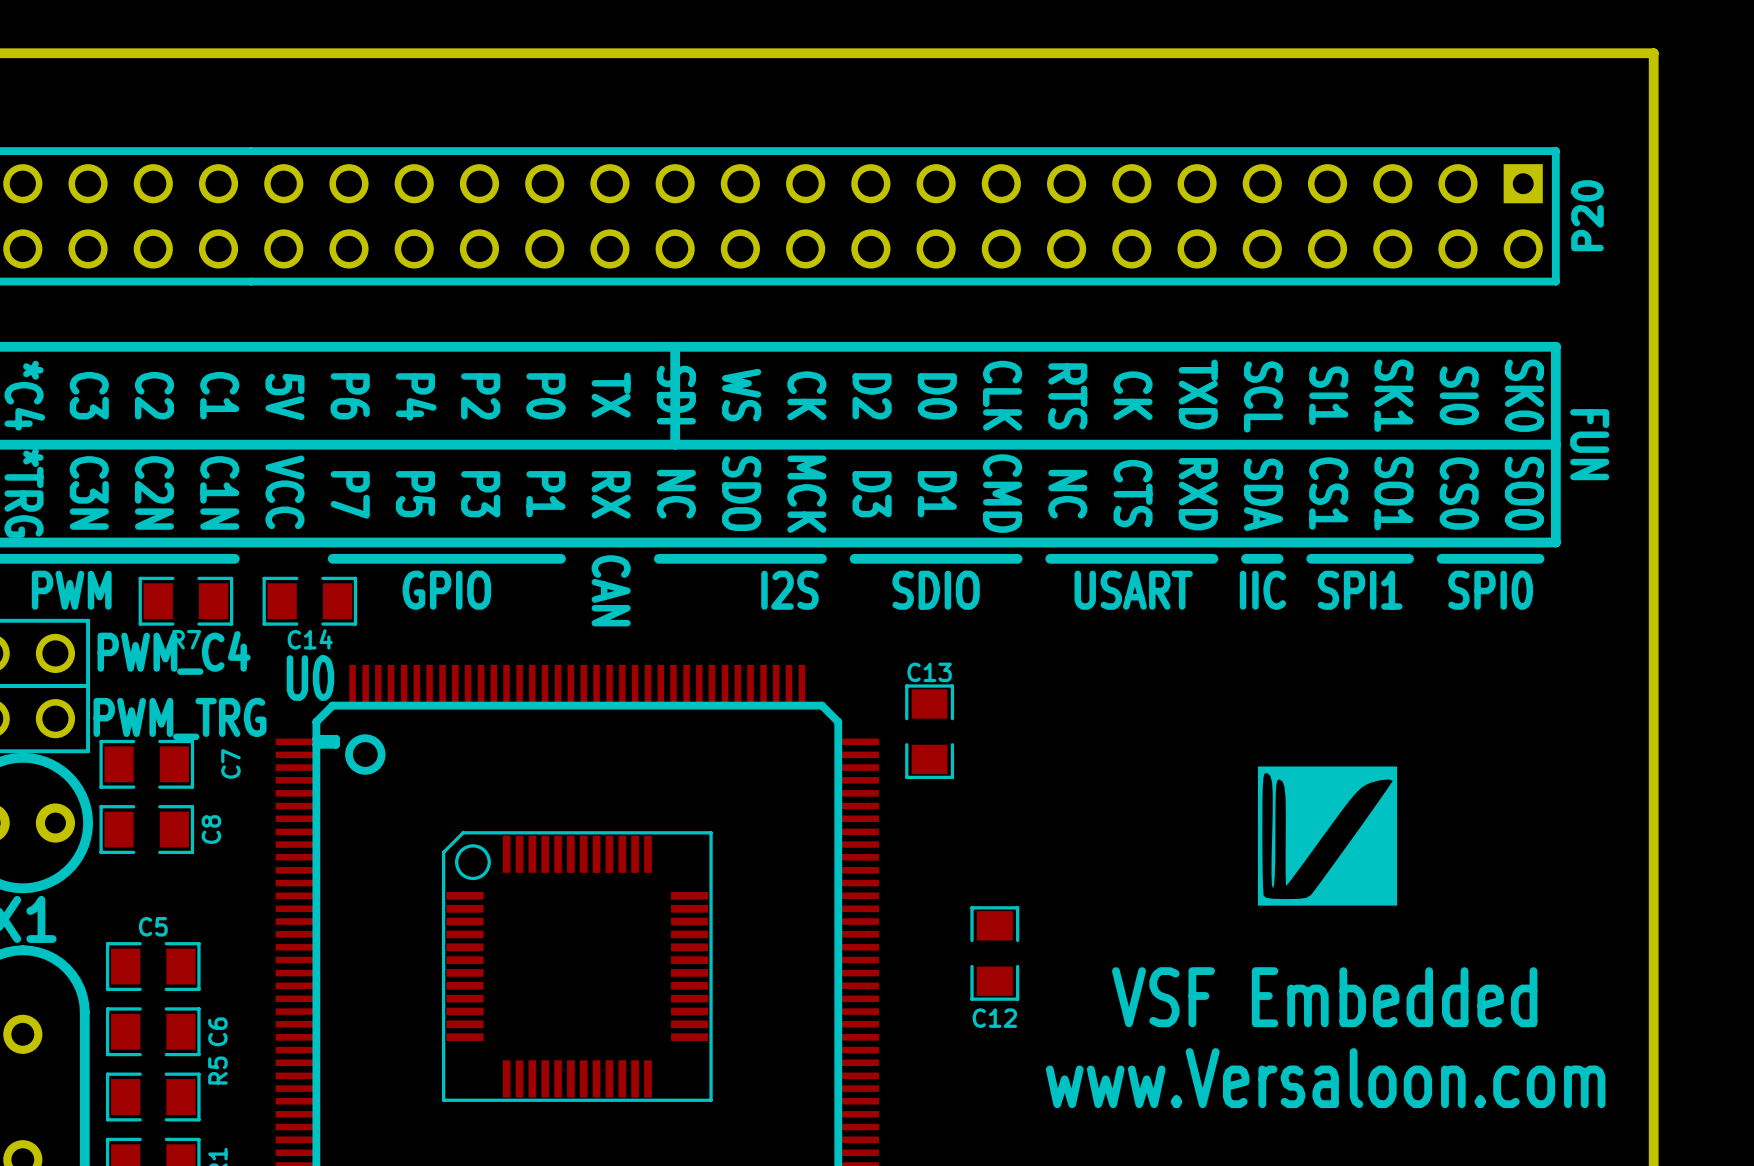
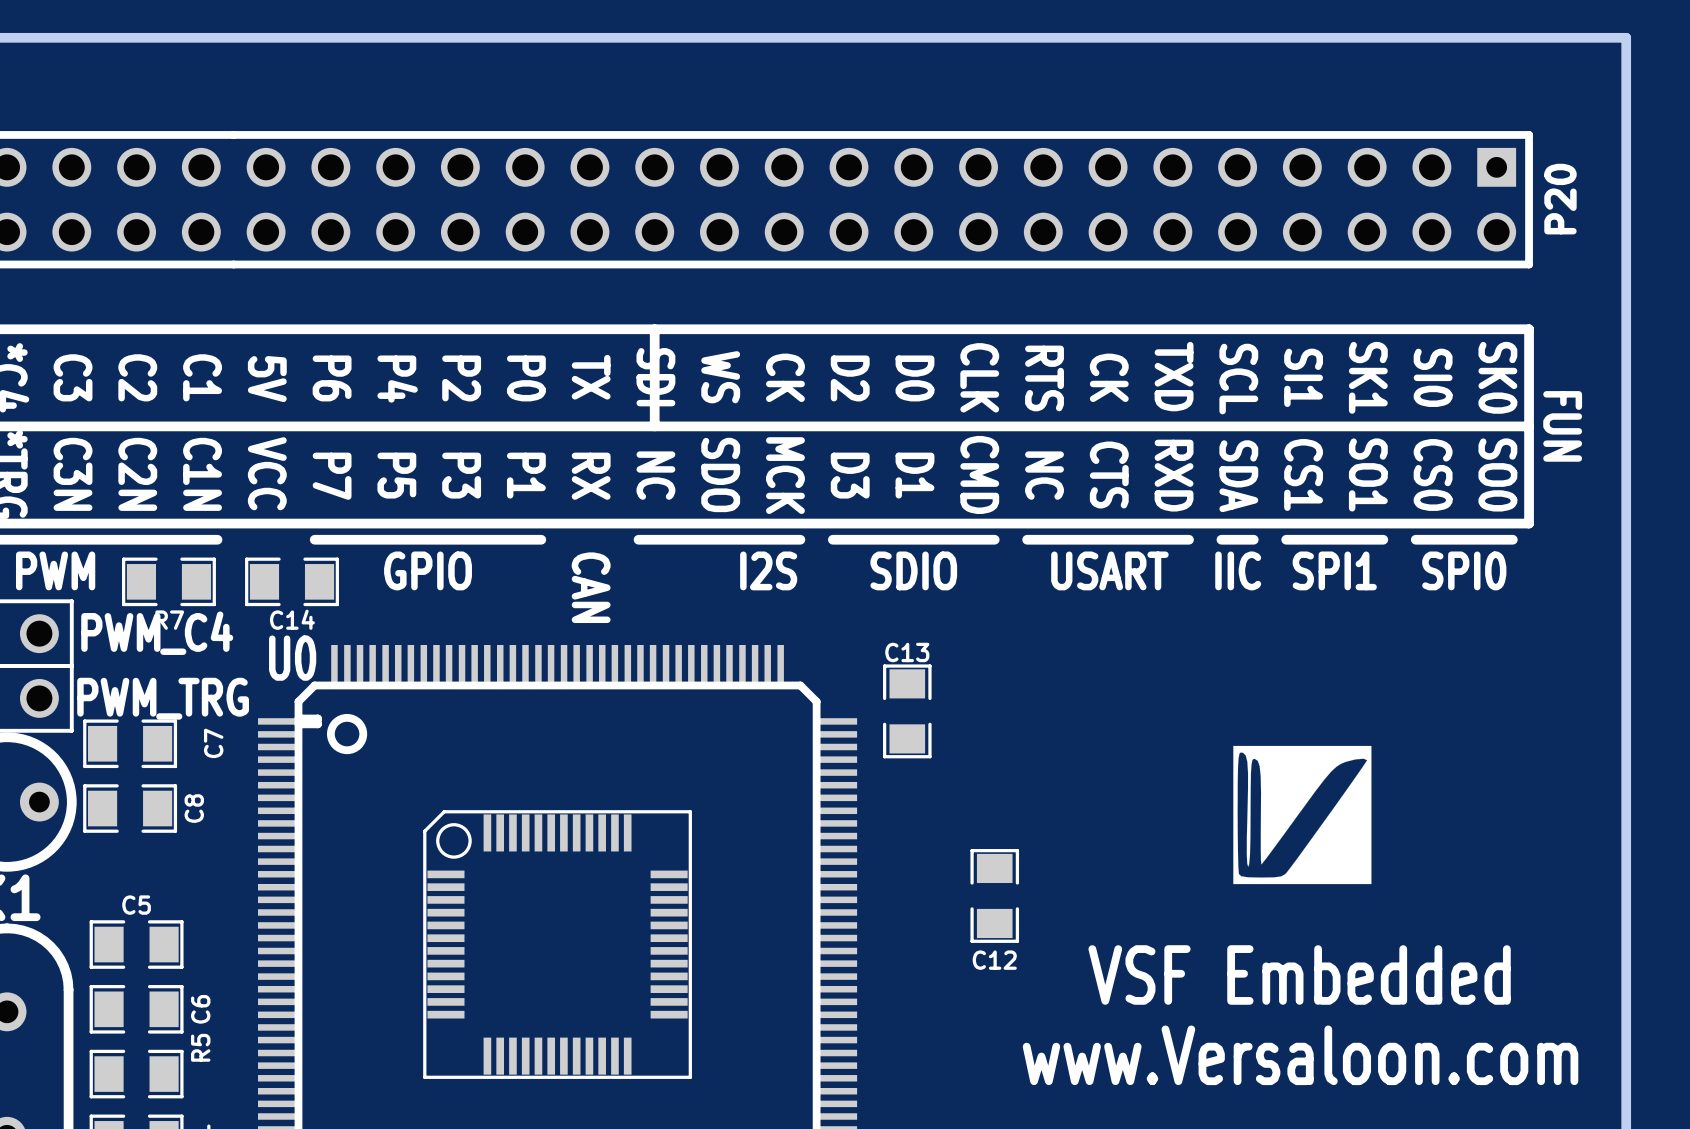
text position: CAN (611, 590) -> CAN (591, 587)
C12 position: (994, 953) -> (994, 895)

